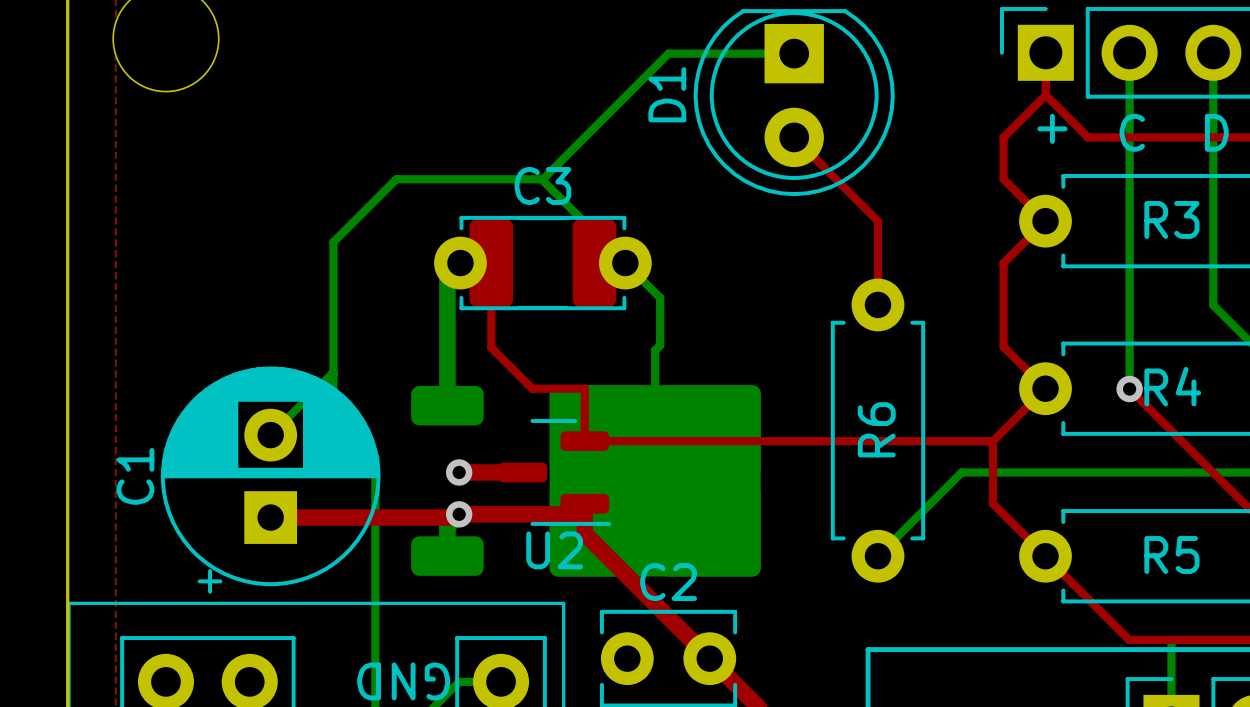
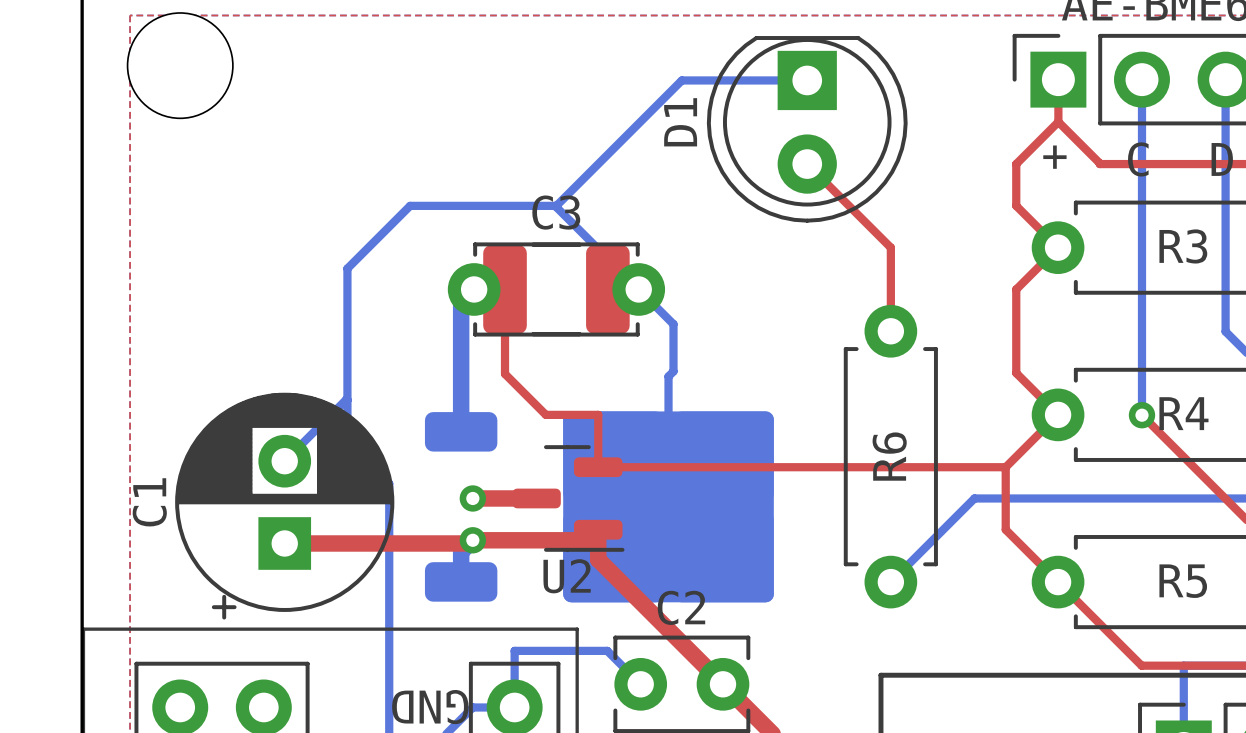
bottom track: none -> (640, 684) (607, 650) (514, 650) (514, 707)

